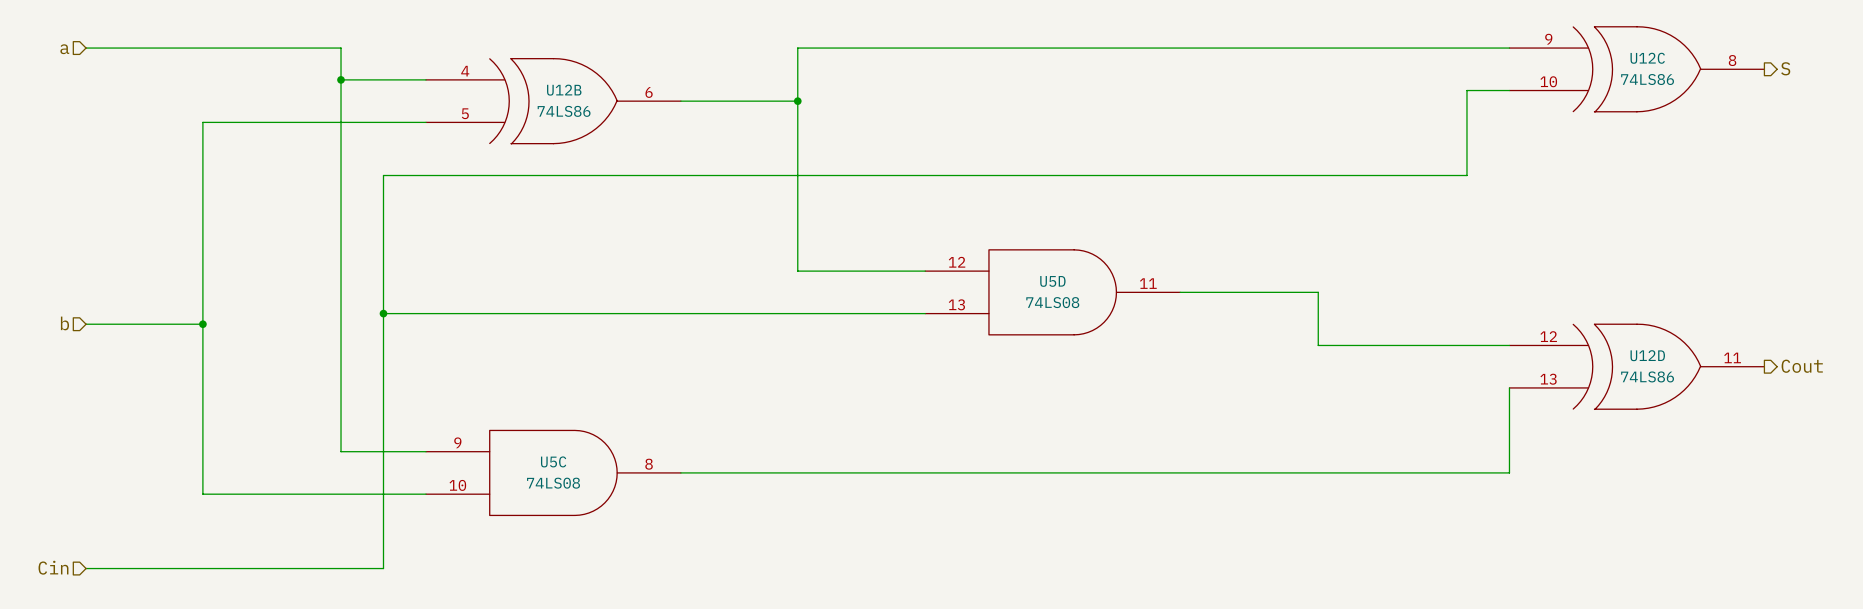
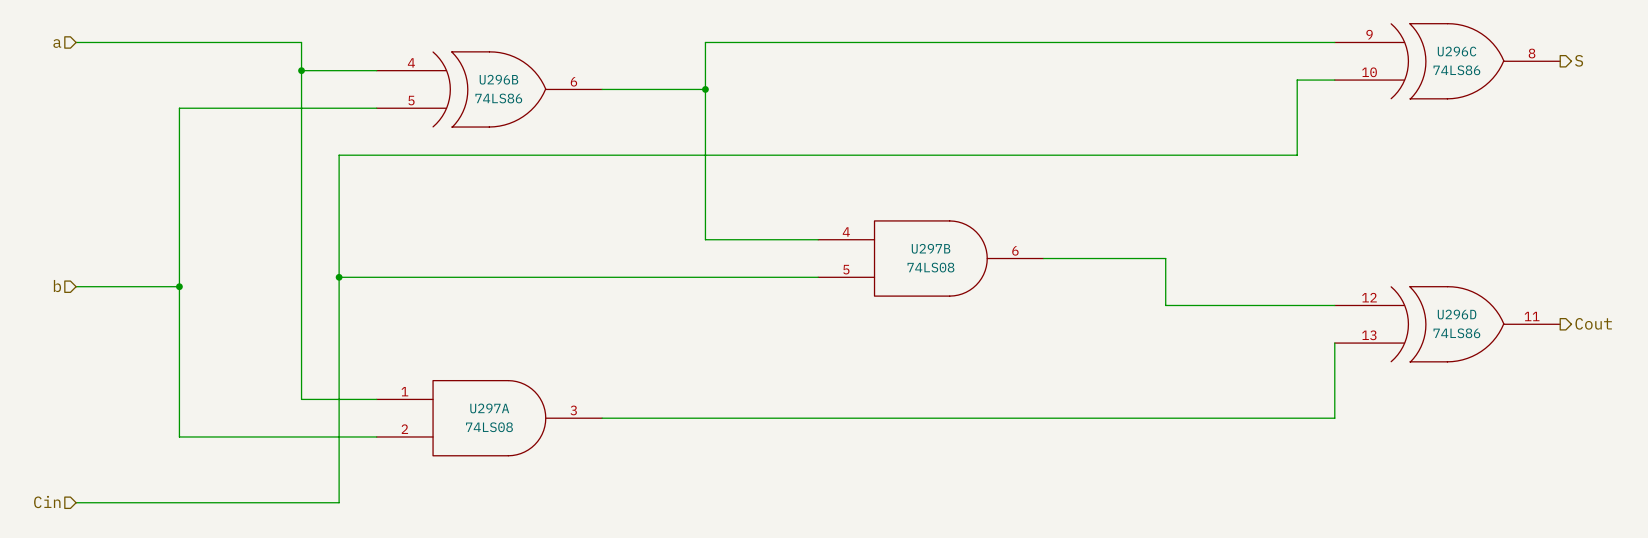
U12C name: U12C (1647, 58) -> U296C (1457, 51)
U12B name: U12B (564, 90) -> U296B (498, 79)
U5D pin number: 12 (957, 262) -> 4 (846, 231)
U5D name: U5D (1052, 281) -> U297B (931, 248)
U5D pin number: 11 (1148, 283) -> 6 (1015, 250)
U5D pin number: 13 (956, 304) -> 5 (846, 269)
U12D name: U12D (1647, 355) -> U296D (1457, 314)
U5C pin number: 9 (457, 442) -> 1 (404, 391)
U5C name: U5C (553, 461) -> U297A (489, 408)
U5C pin number: 8 (649, 464) -> 3 (573, 410)
U5C pin number: 10 (457, 485) -> 2 (404, 429)

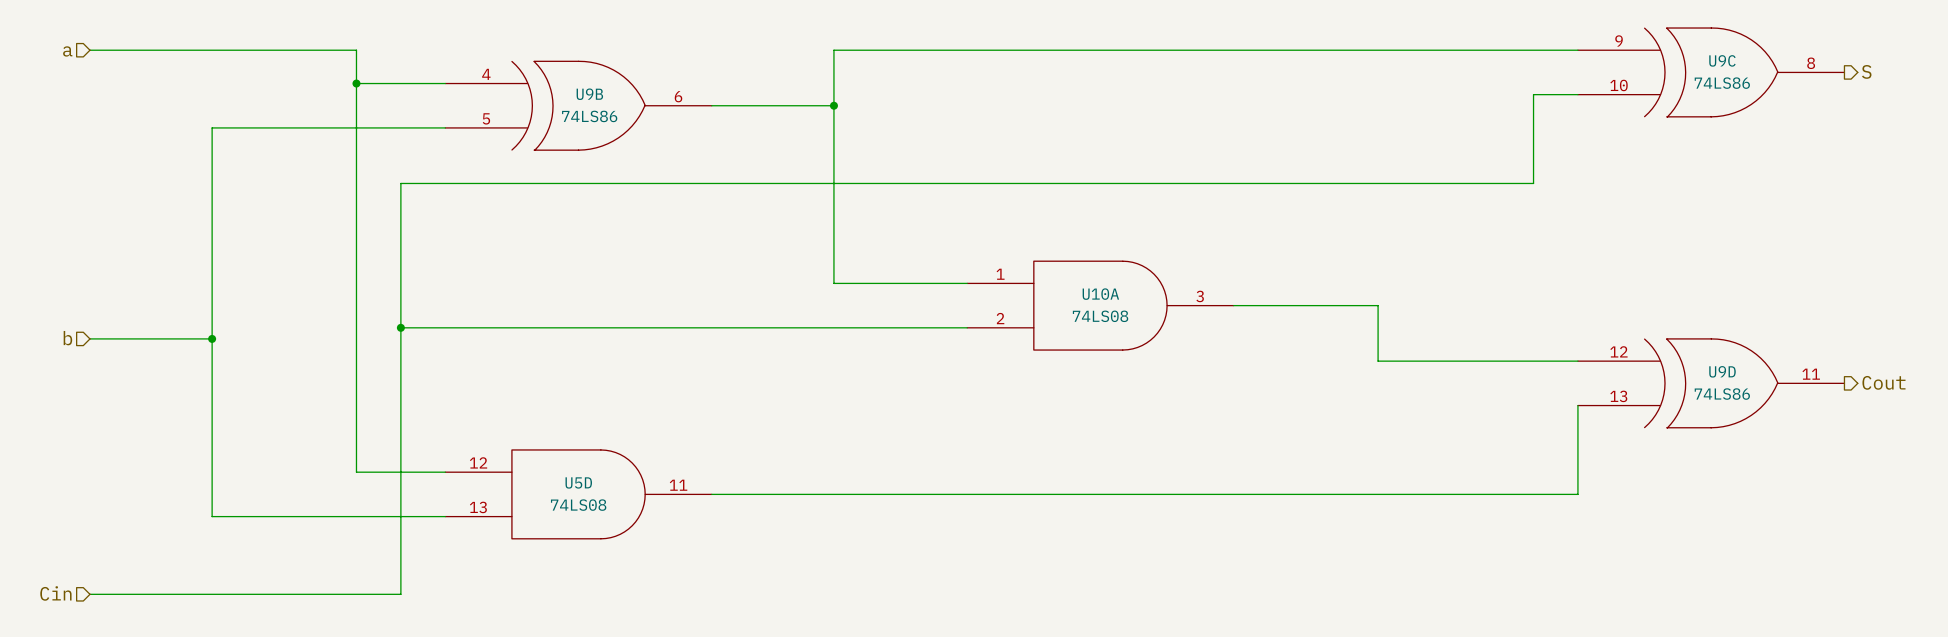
U296C name: U296C (1457, 51) -> U9C (1722, 60)
U296B name: U296B (498, 79) -> U9B (589, 94)
U297B pin number: 4 (846, 231) -> 1 (1000, 274)
U297B name: U297B (931, 248) -> U10A (1100, 294)
U297B pin number: 6 (1015, 250) -> 3 (1200, 296)
U297B pin number: 5 (846, 269) -> 2 (1000, 318)
U296D name: U296D (1457, 314) -> U9D (1722, 371)
U297A pin number: 1 (404, 391) -> 12 (478, 462)
U297A name: U297A (489, 408) -> U5D (578, 482)
U297A pin number: 3 (573, 410) -> 11 (678, 485)
U297A pin number: 2 (404, 429) -> 13 (478, 507)

